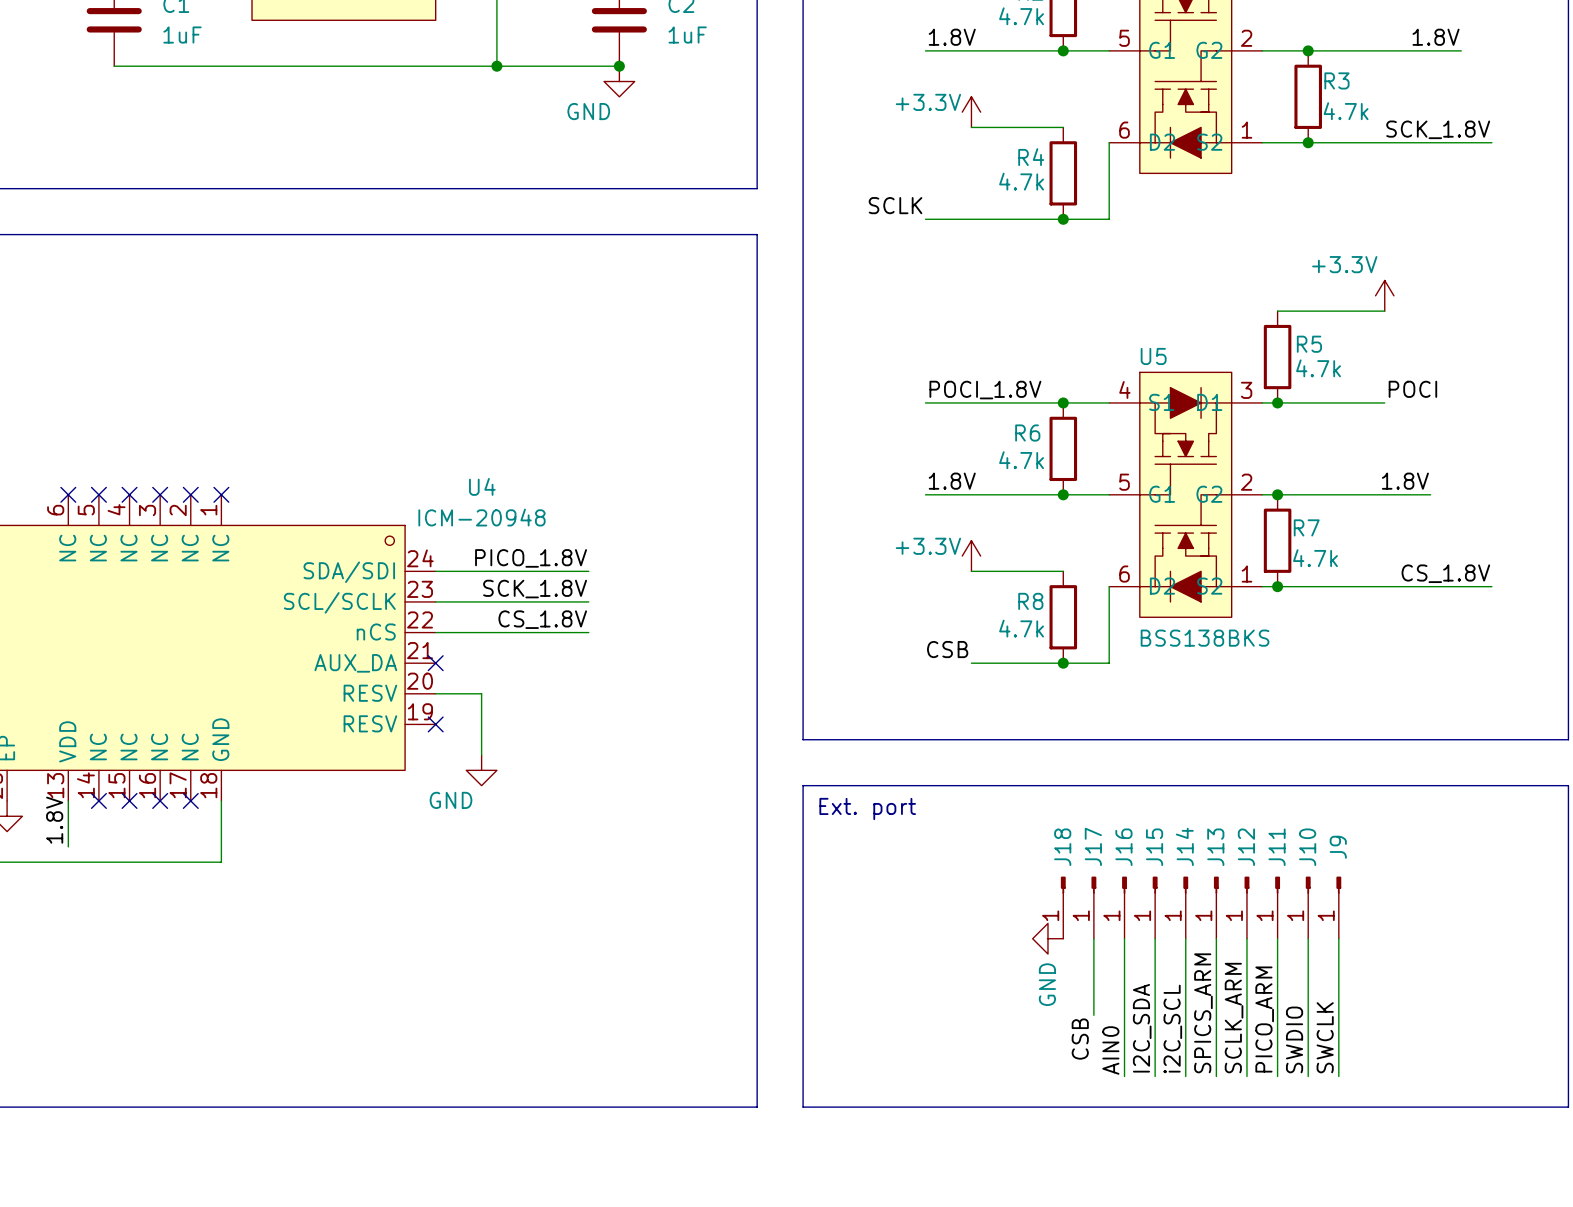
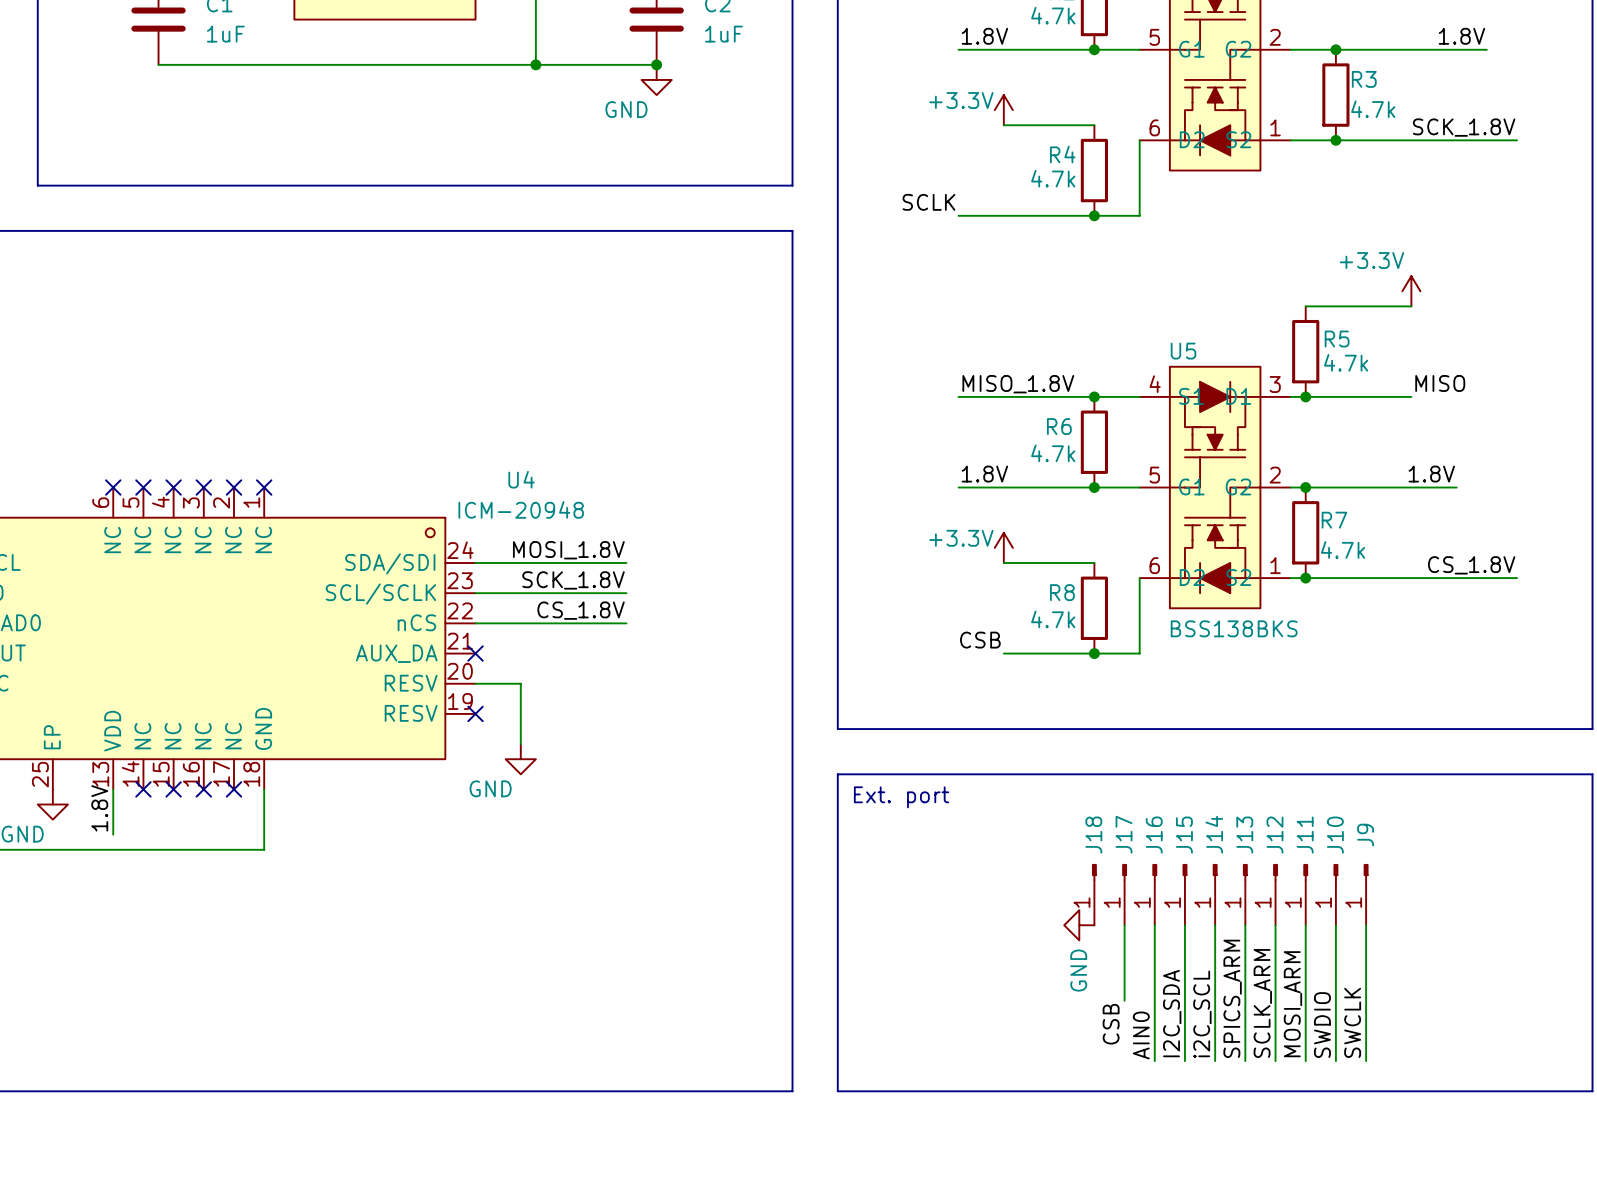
label: POCI (1412, 389) -> MISO (1440, 383)
label: POCI_1.8V (985, 390) -> MISO_1.8V (1018, 384)
label: PICO_1.8V (531, 558) -> MOSI_1.8V (568, 550)
label: PICO_ARM (1264, 1019) -> MOSI_ARM (1292, 1004)

